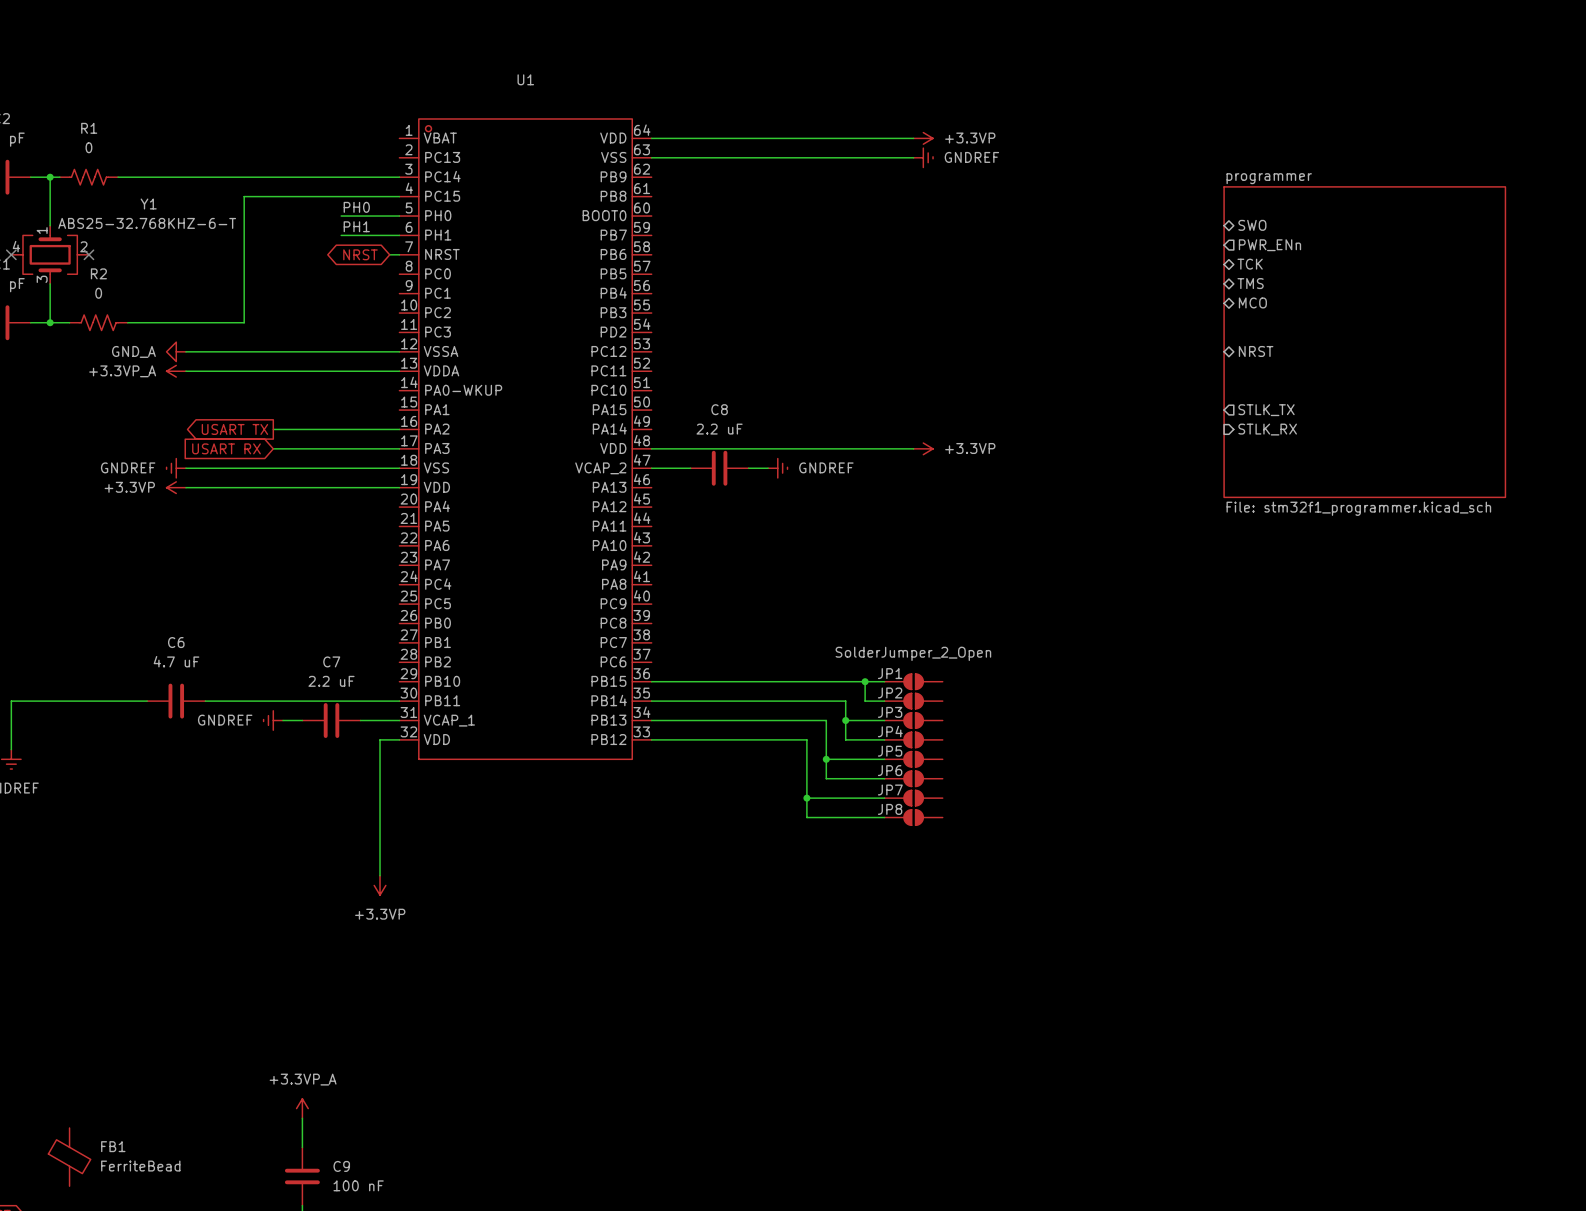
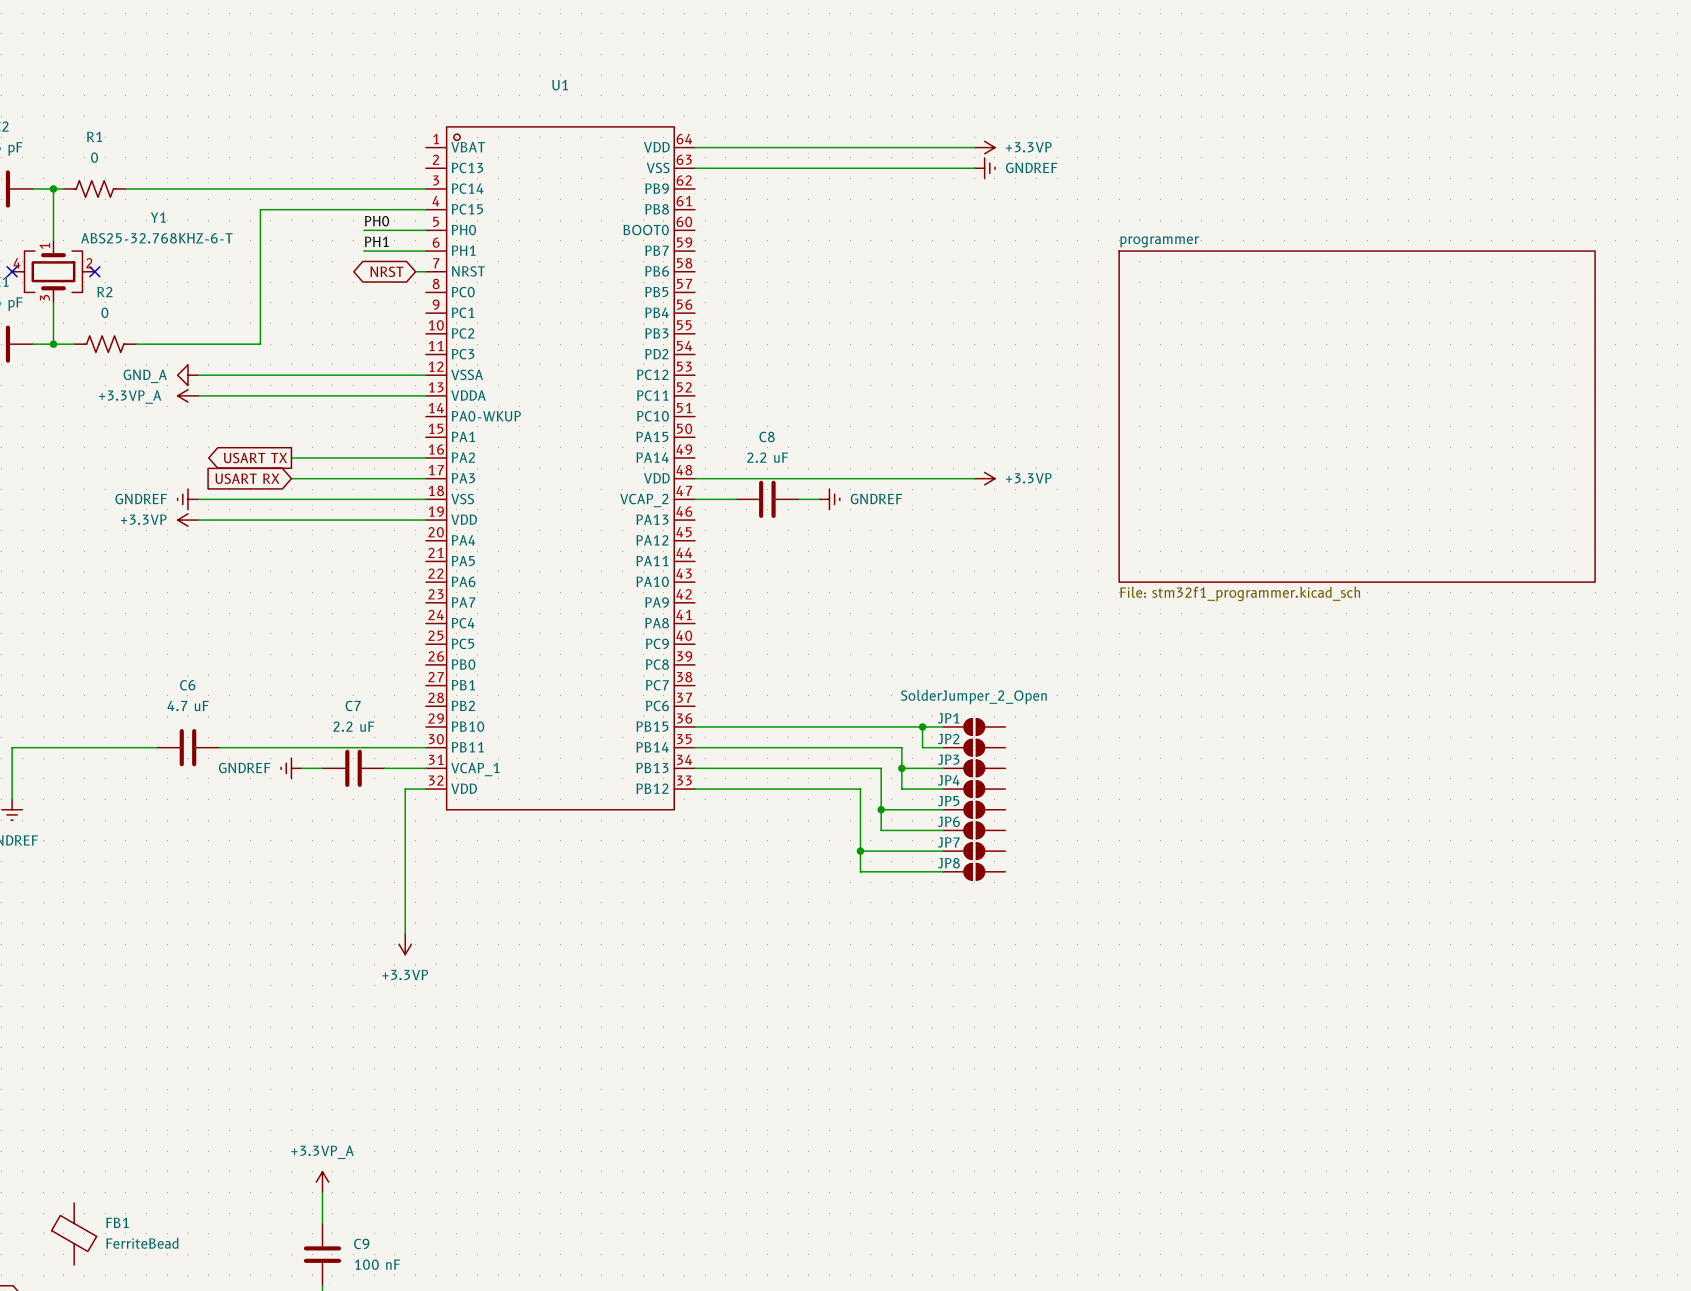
sheet pin: SWO (1252, 225) -> none
sheet pin: PWR_ENn (1269, 245) -> none
sheet pin: TCK (1250, 264) -> none
sheet pin: TMS (1250, 283) -> none
sheet pin: MCO (1252, 302) -> none
sheet programmer: File: stm32f1_programmer.kicad_sch (1364, 342) -> none
sheet pin: NRST (1256, 351) -> none
sheet programmer: none -> File: stm32f1_programmer.kicad_sch (1357, 416)
sheet pin: STLK_TX (1266, 410) -> none
sheet pin: STLK_RX (1267, 429) -> none

